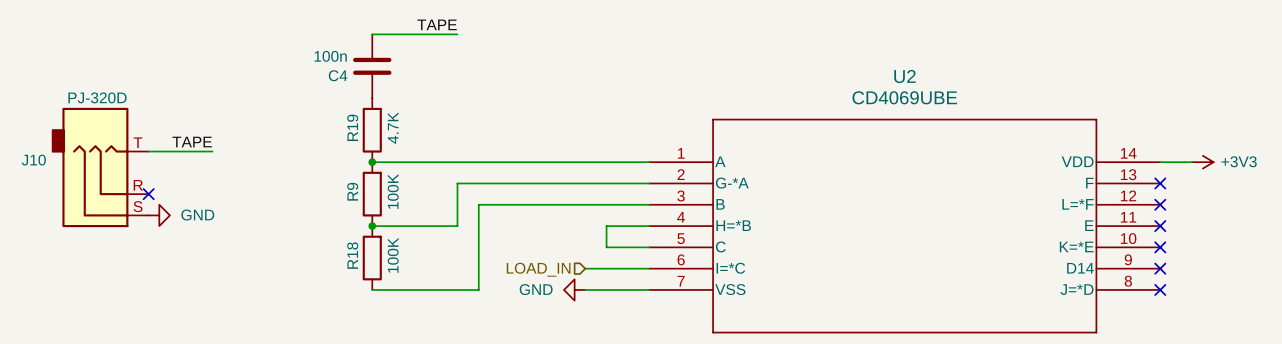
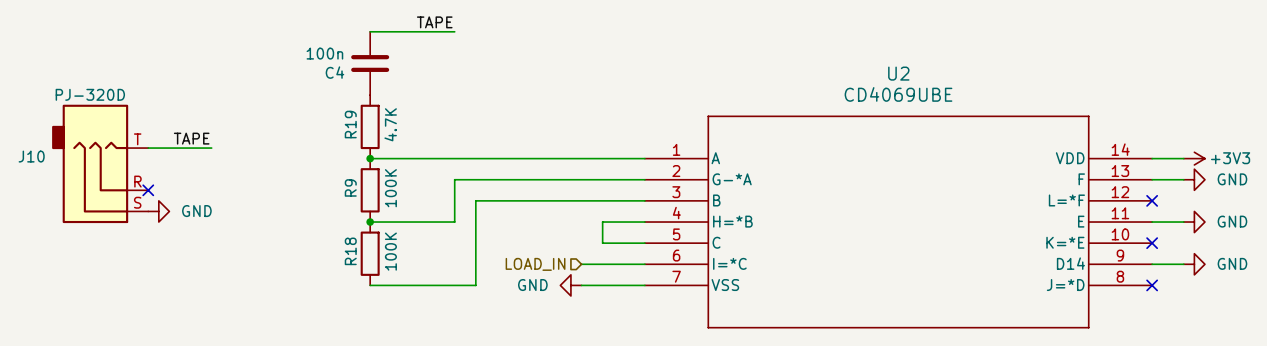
wire: none -> (1152, 179) (1183, 179)
no-connect mark: (1160, 183) -> none
power symbol: none -> GND (1194, 179)
wire: none -> (1152, 222) (1183, 222)
no-connect mark: (1160, 226) -> none
power symbol: none -> GND (1194, 222)
wire: none -> (1152, 264) (1183, 264)
no-connect mark: (1160, 268) -> none
power symbol: none -> GND (1194, 264)

